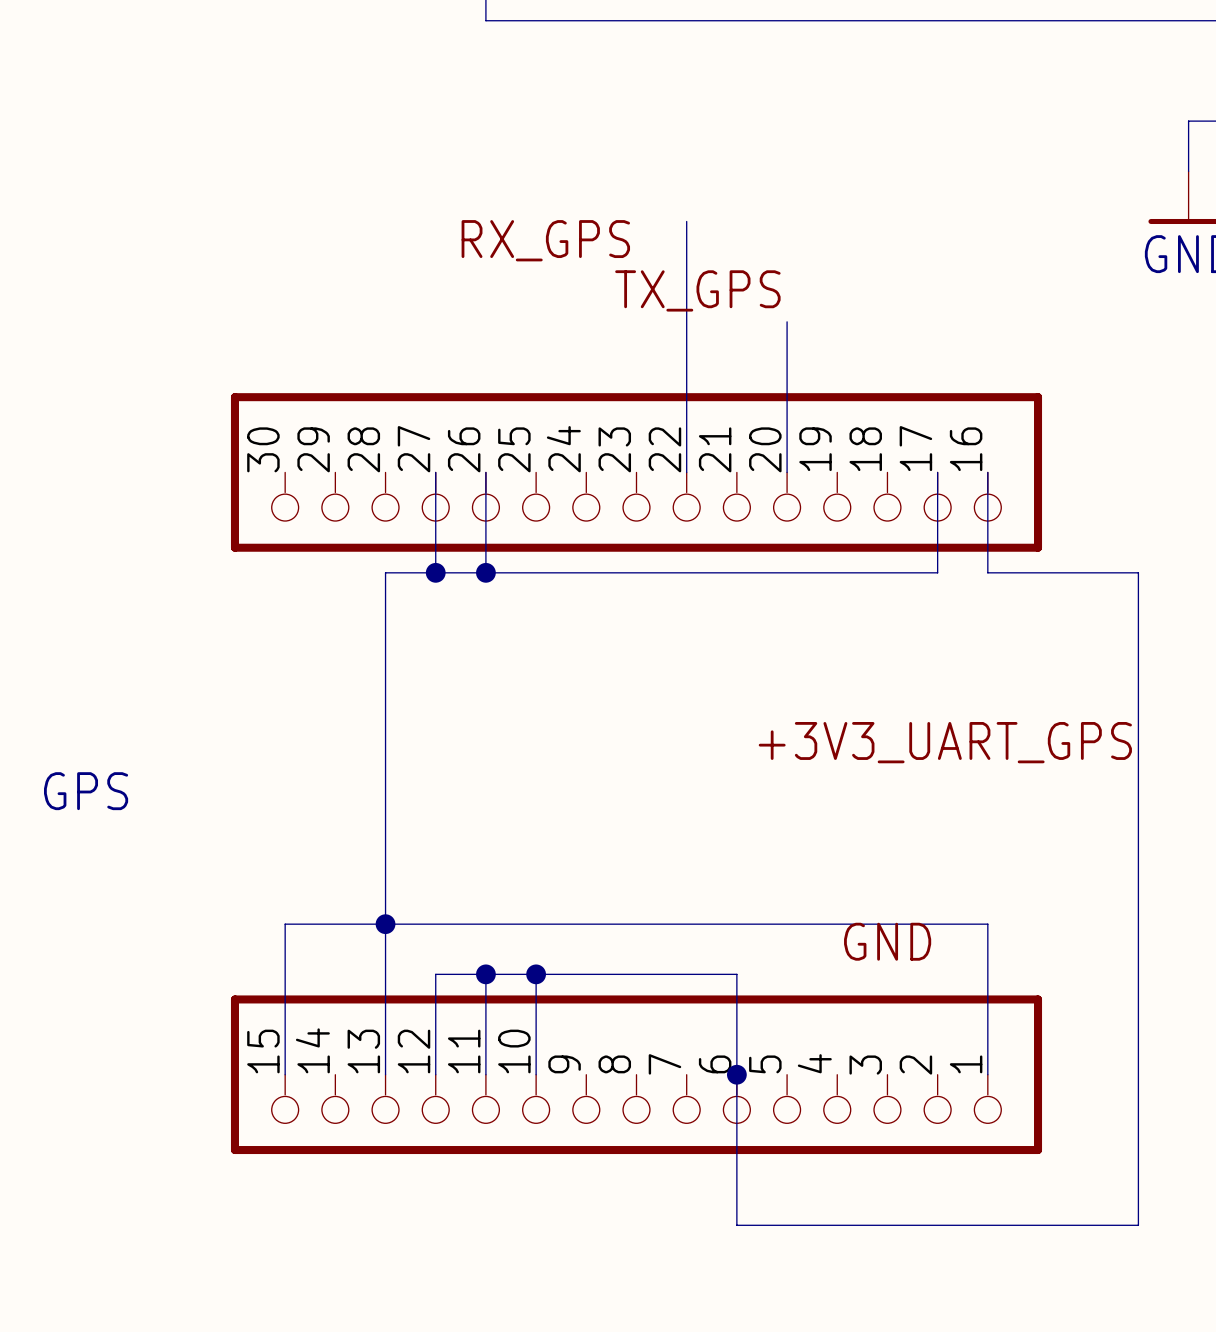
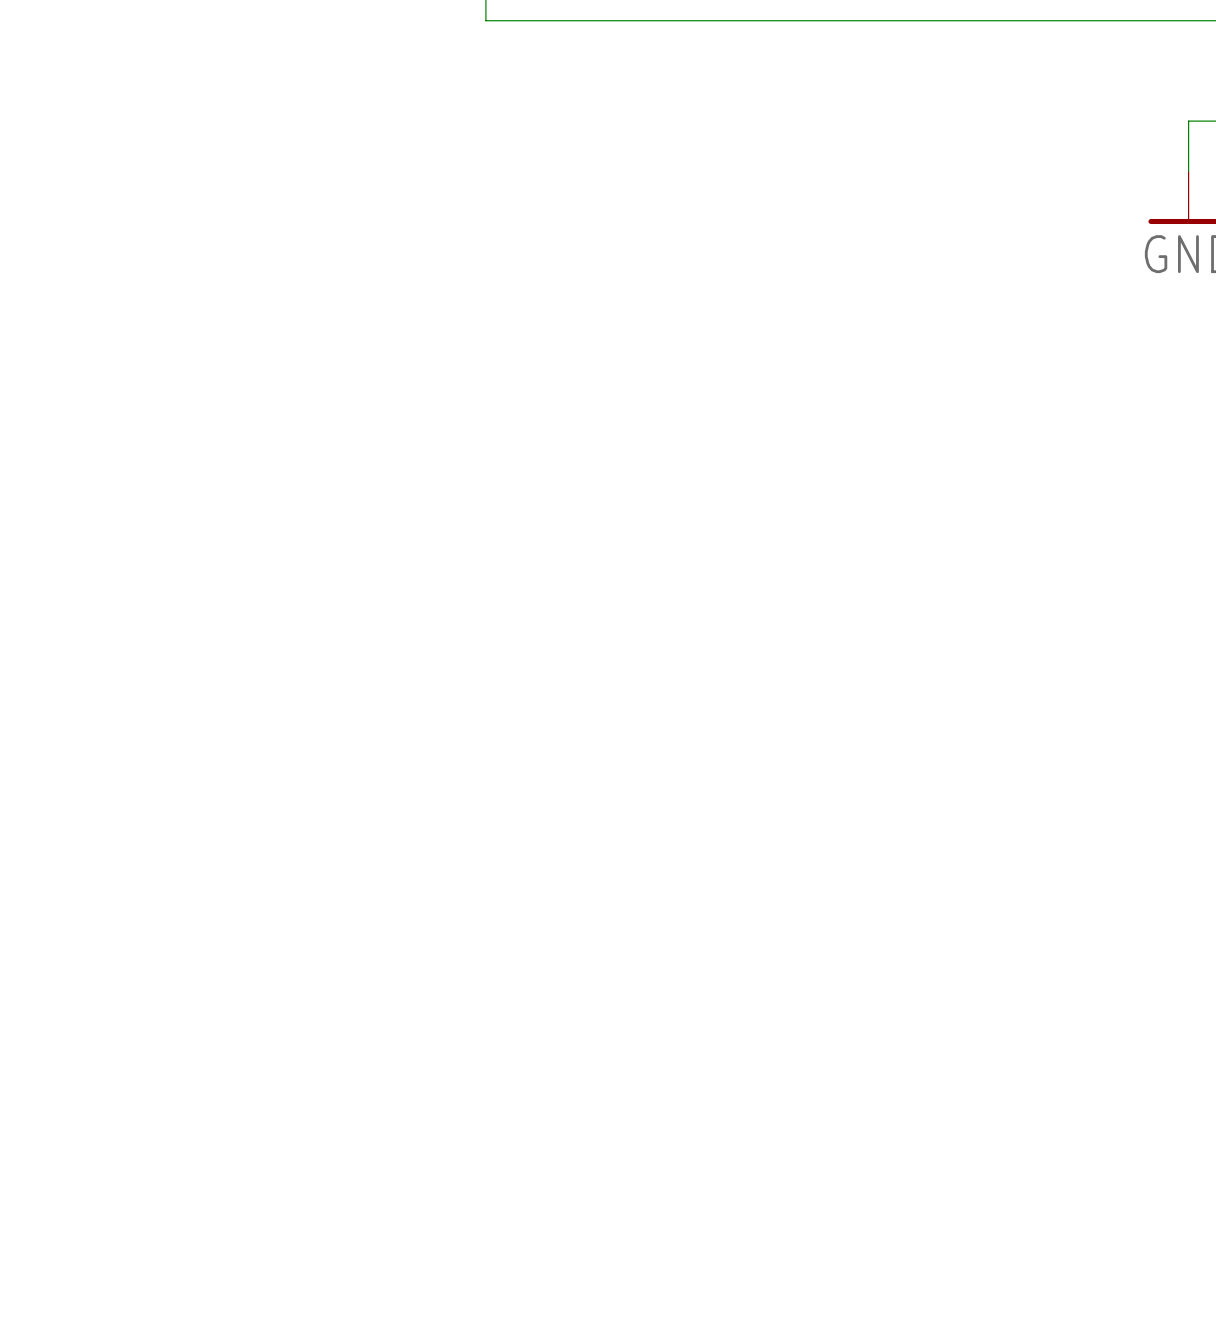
wire: (686, 221) (686, 472) -> none
label: RX_GPS (545, 240) -> none
label: TX_GPS (697, 290) -> none
wire: (787, 321) (787, 472) -> none
wire: (435, 472) (435, 572) -> none
wire: (485, 472) (485, 572) -> none
part: (636, 472) -> none
wire: (937, 472) (937, 572) (385, 572) (385, 1074) -> none
wire: (987, 472) (987, 572) (1138, 572) (1138, 1225) (736, 1225) (736, 974) (435, 974) (435, 1074) -> none
junction: (435, 572) -> none
junction: (485, 572) -> none
label: +3V3_UART_GPS (945, 742) -> none
text: GPS (86, 791) -> none
junction: (385, 924) -> none
label: GND (887, 941) -> none
wire: (485, 974) (485, 1074) -> none
junction: (485, 974) -> none
wire: (536, 974) (536, 1074) -> none
junction: (536, 974) -> none
wire: (285, 1074) (285, 924) (987, 924) (987, 1074) -> none
part: (636, 1074) -> none
junction: (736, 1074) -> none

